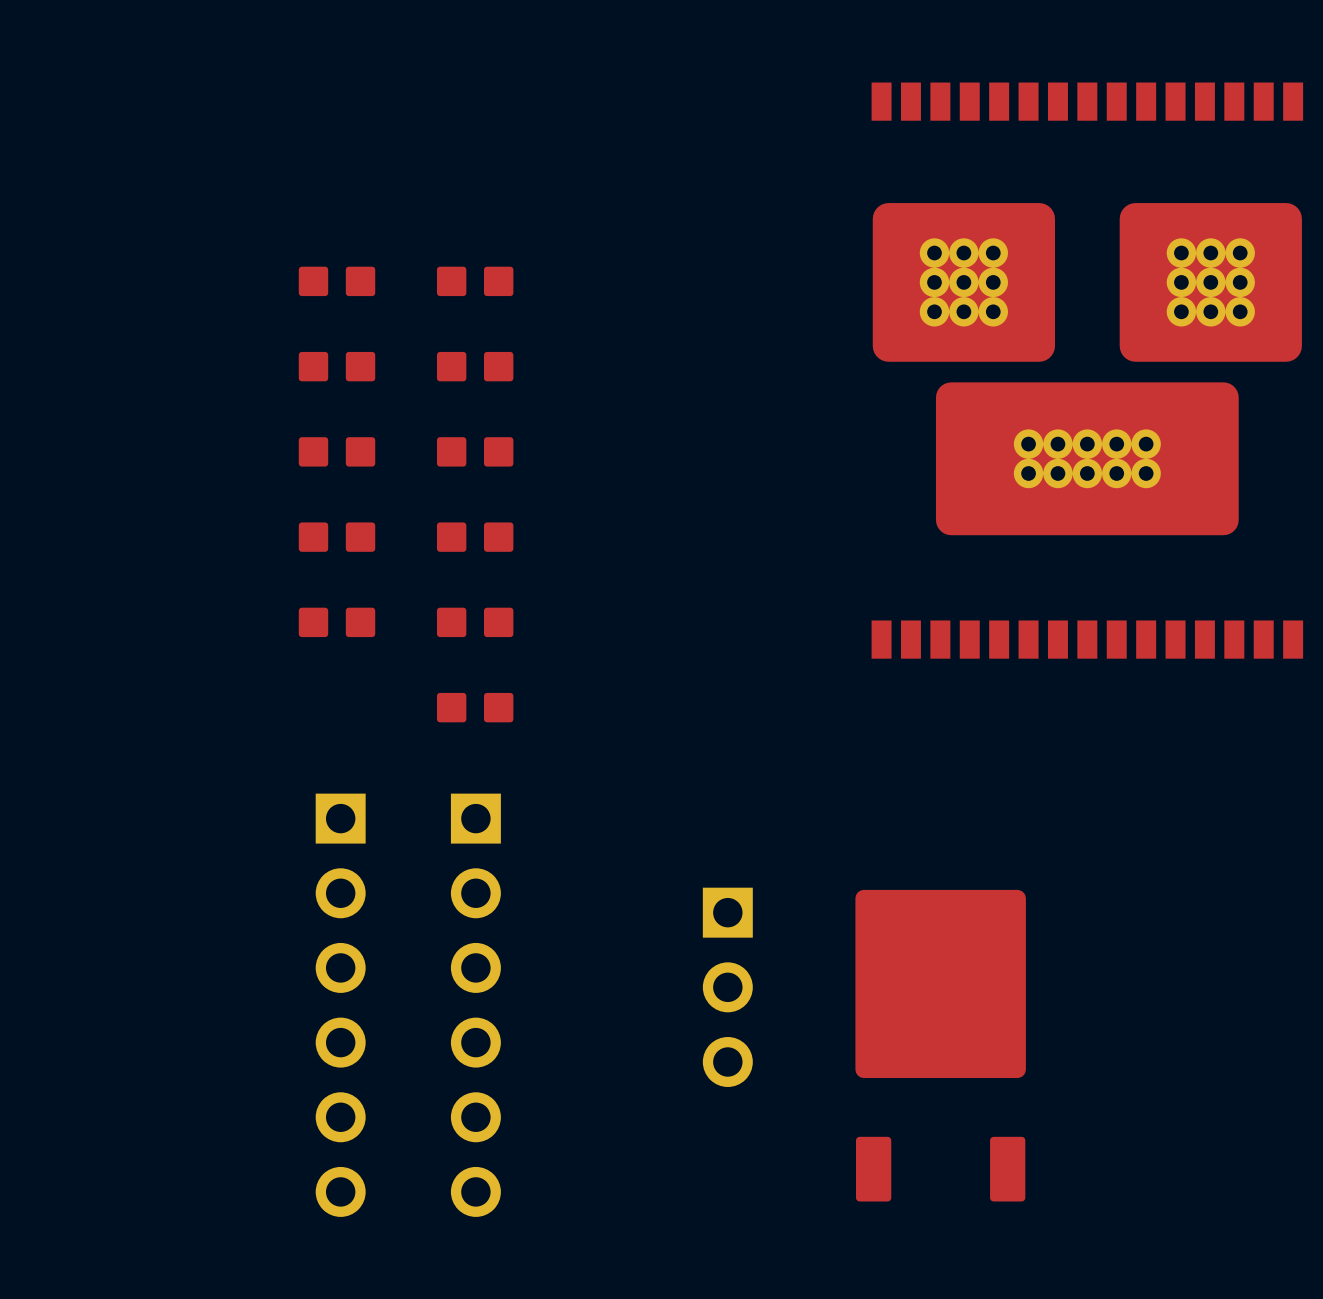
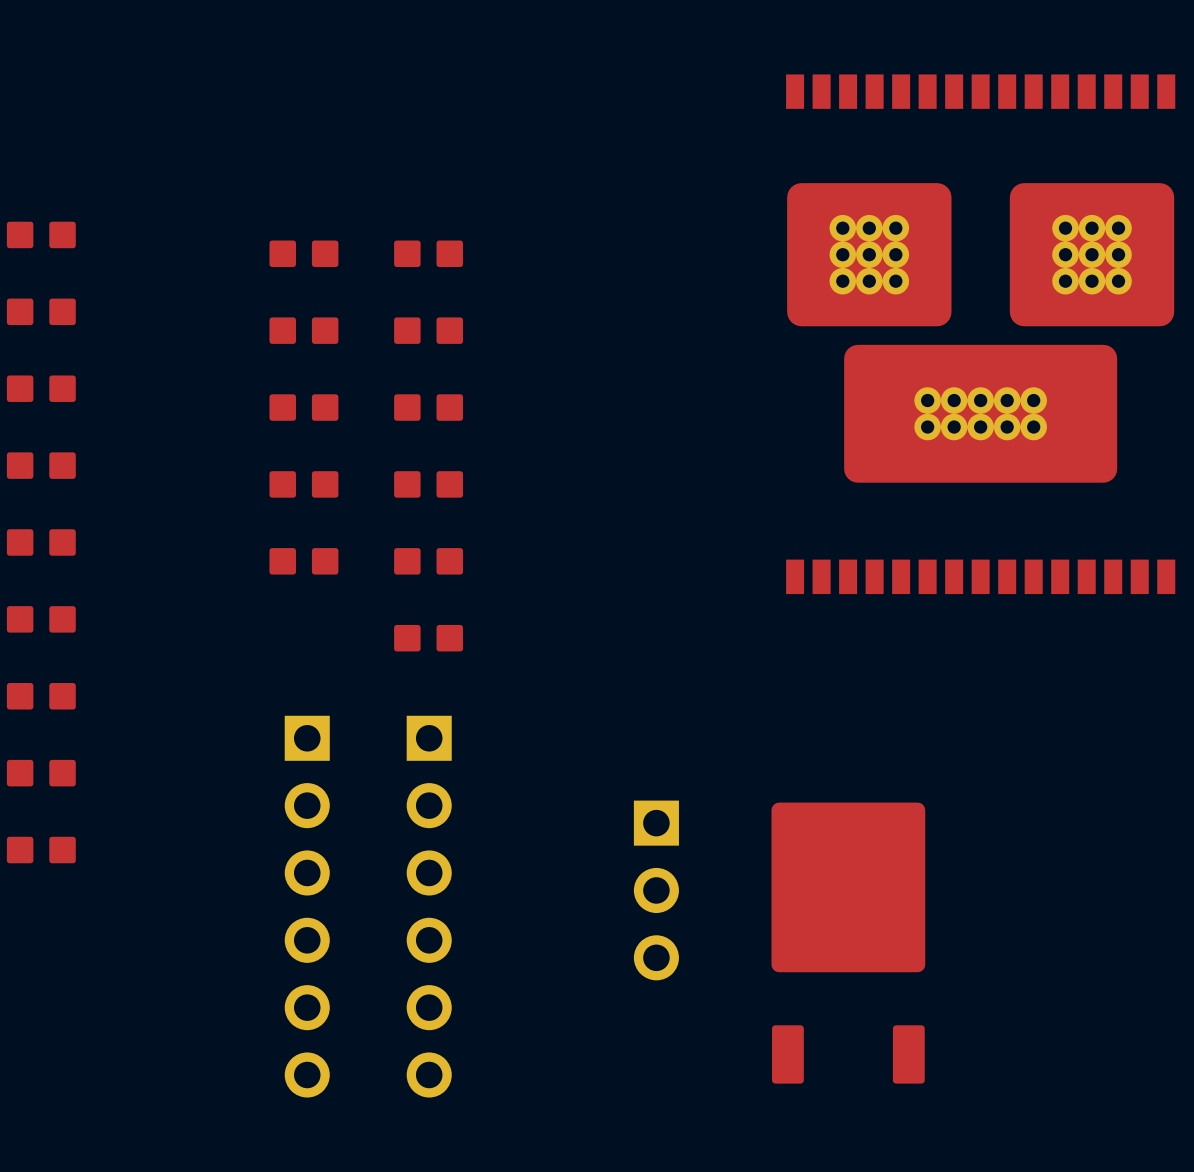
part: none -> (41, 234)
part: none -> (41, 311)
part: none -> (41, 388)
part: none -> (41, 465)
part: none -> (41, 542)
part: none -> (41, 619)
part: none -> (41, 696)
part: none -> (41, 773)
part: none -> (41, 850)

